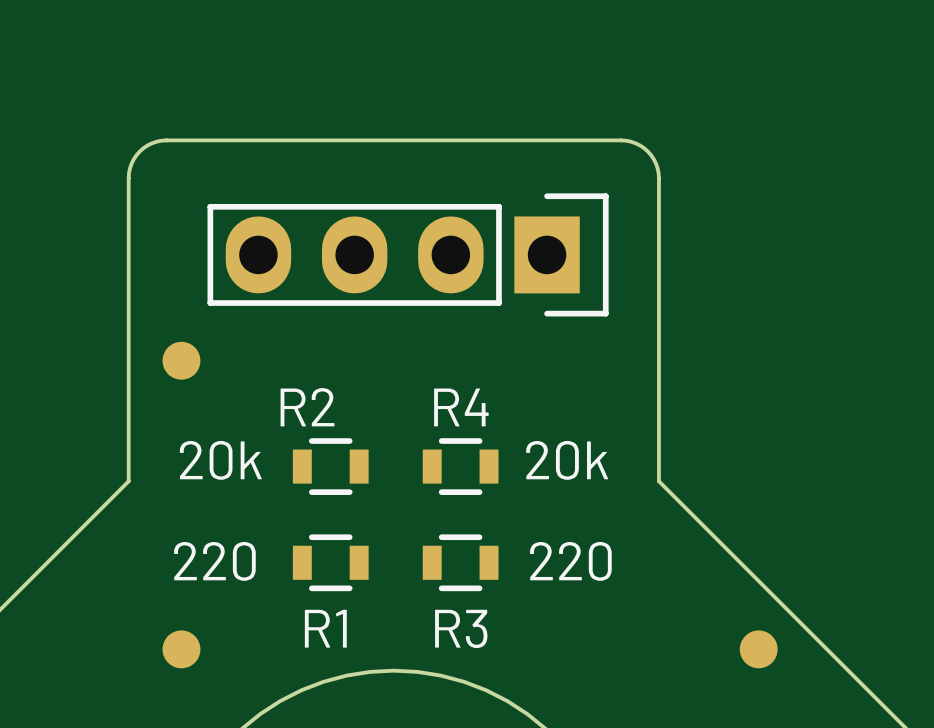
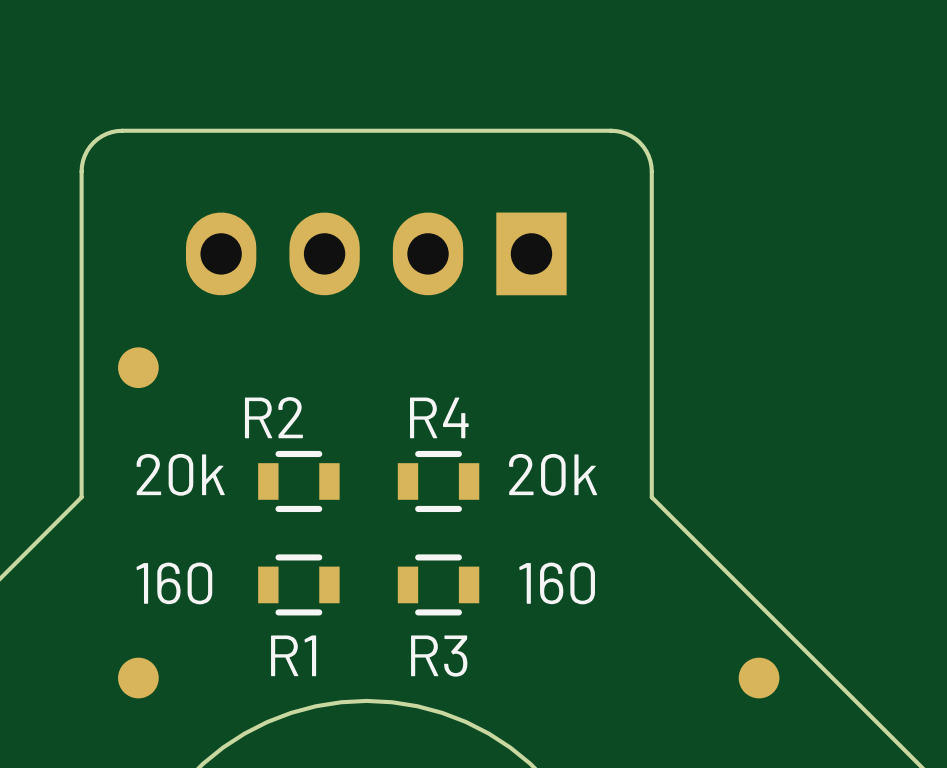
part side: bottom (408, 254) -> top (376, 253)
R1 value: 220 (214, 561) -> 160 (174, 583)
R3 value: 220 (570, 561) -> 160 (557, 583)

